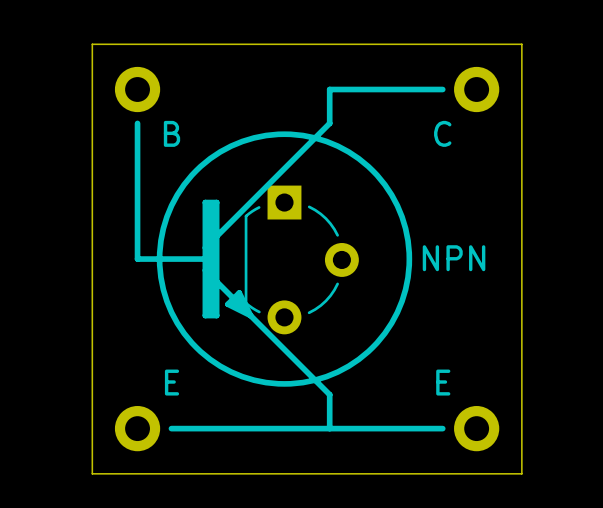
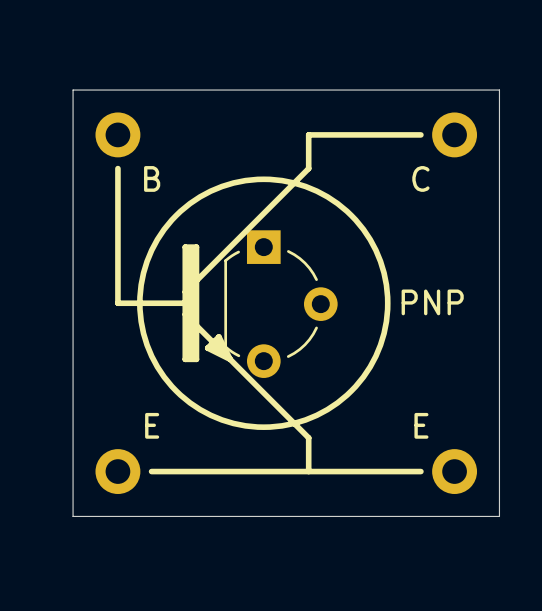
text: NPN (454, 258) -> PNP (432, 302)

